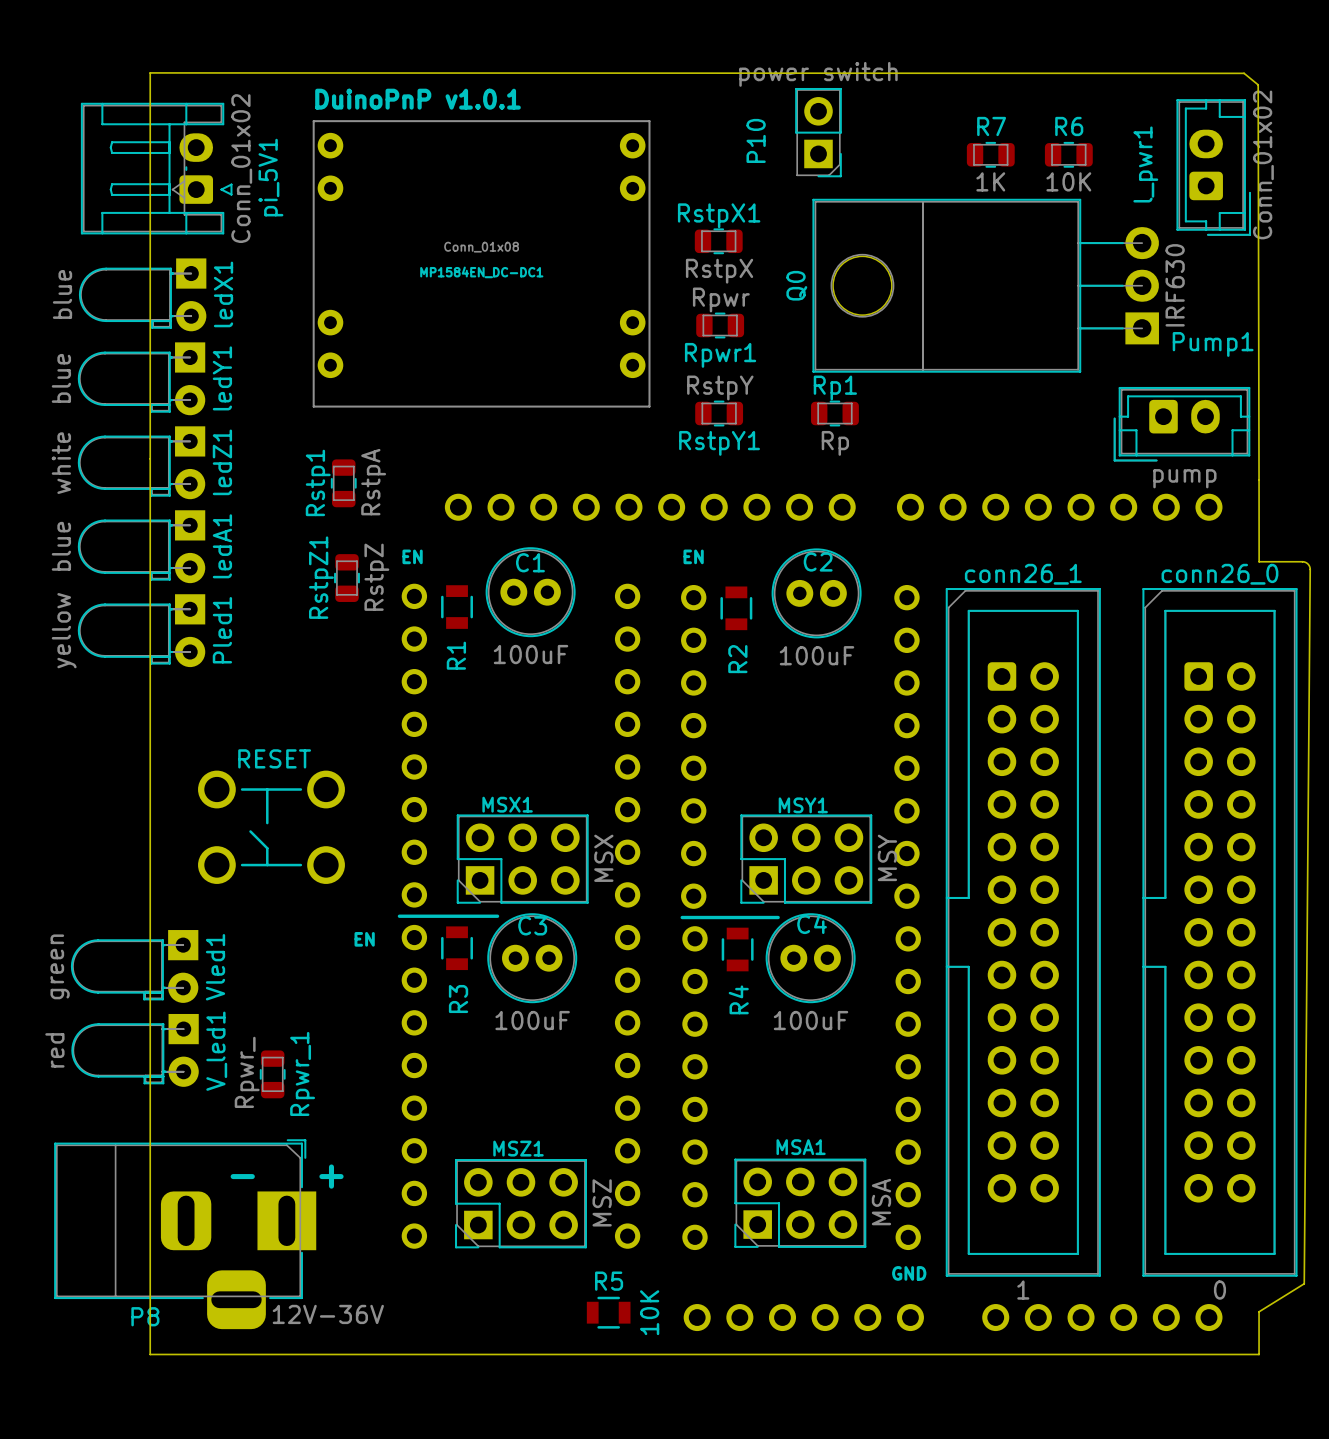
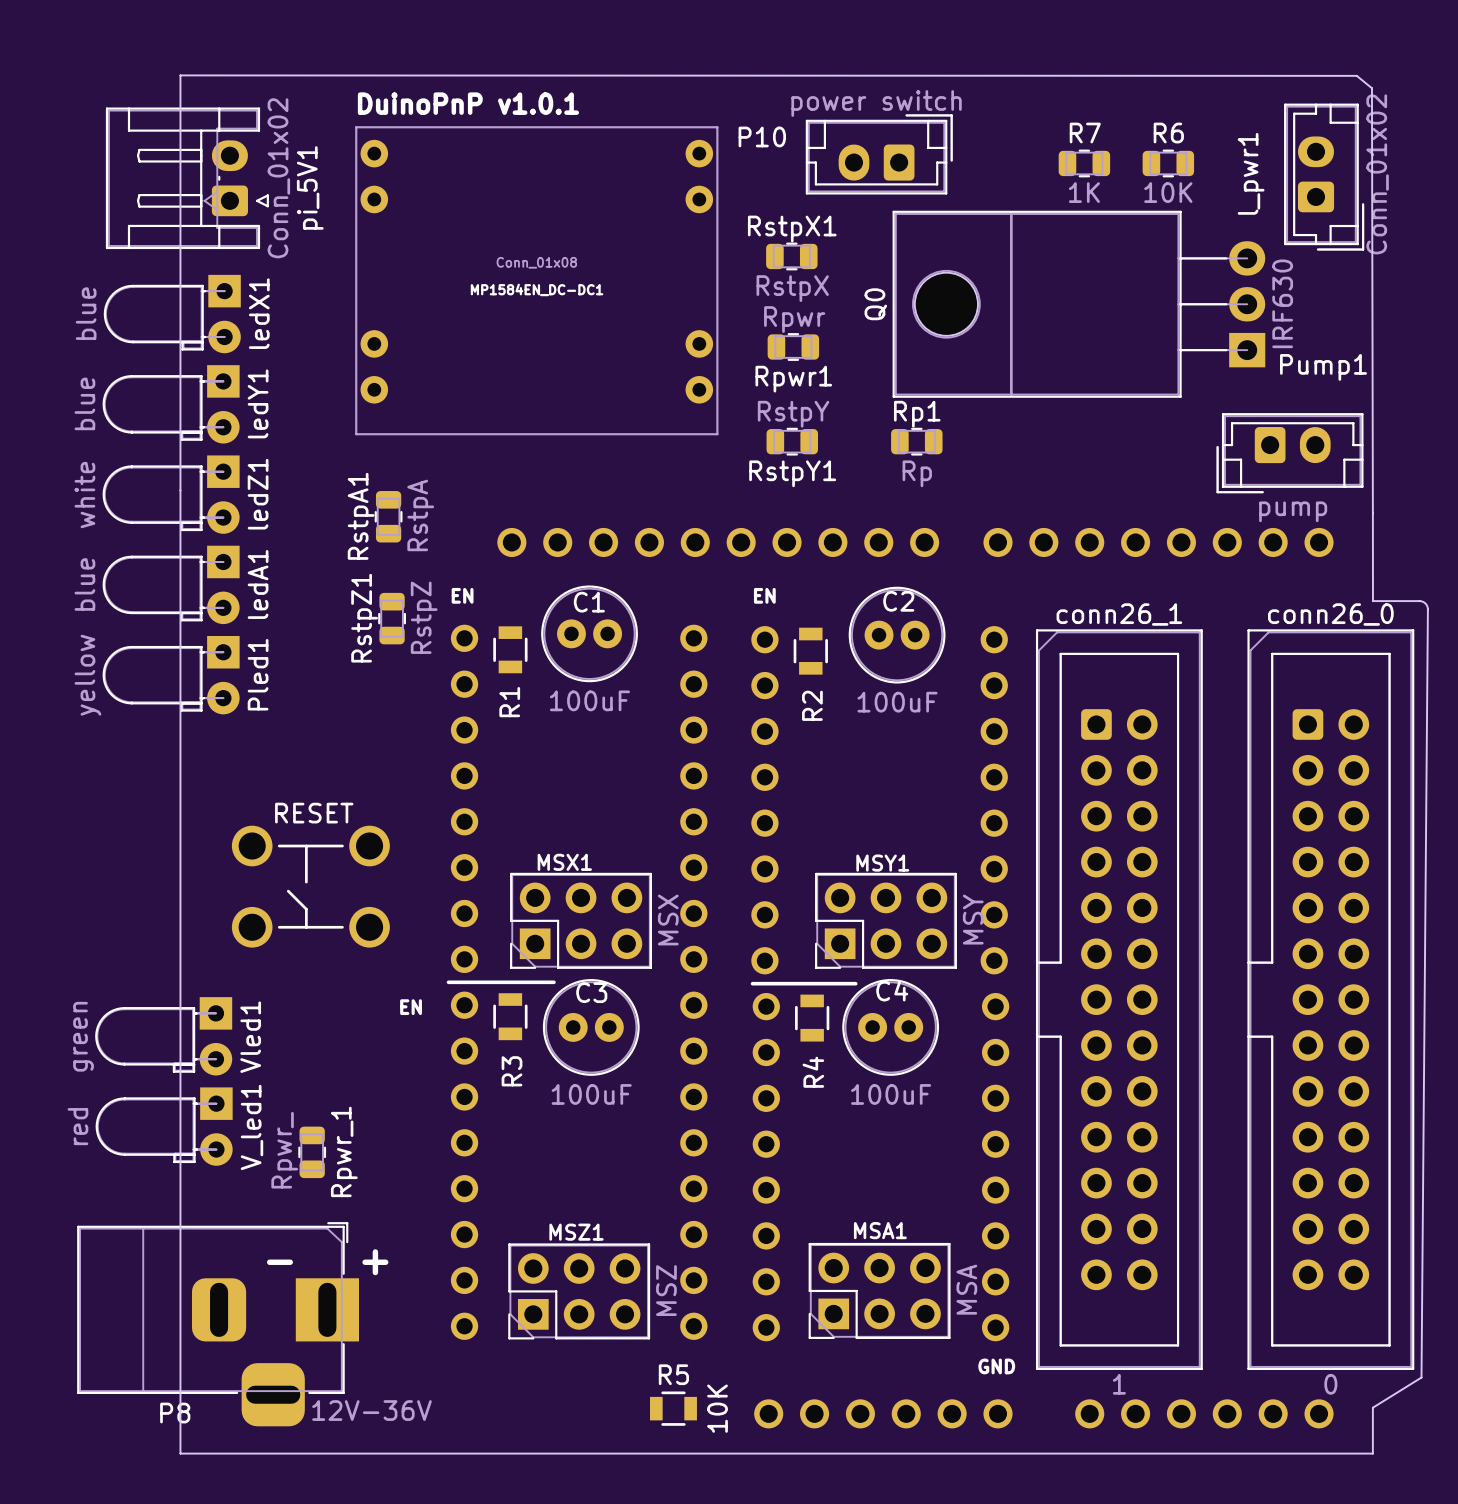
P10 footprint: [795, 87, 842, 178] -> [805, 114, 953, 195]
P10 name position: P10 (756, 140) -> P10 (762, 136)
Rstp1 name: Rstp1 (318, 482) -> RstpA1 (361, 516)

